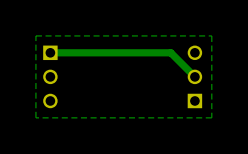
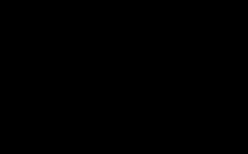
zone outline: (211, 35) (211, 117) (35, 117) (35, 35) (211, 35) -> none
track: (50, 52) (170, 52) (194, 76) -> none
part: (50, 76) -> none
part: (194, 76) -> none

